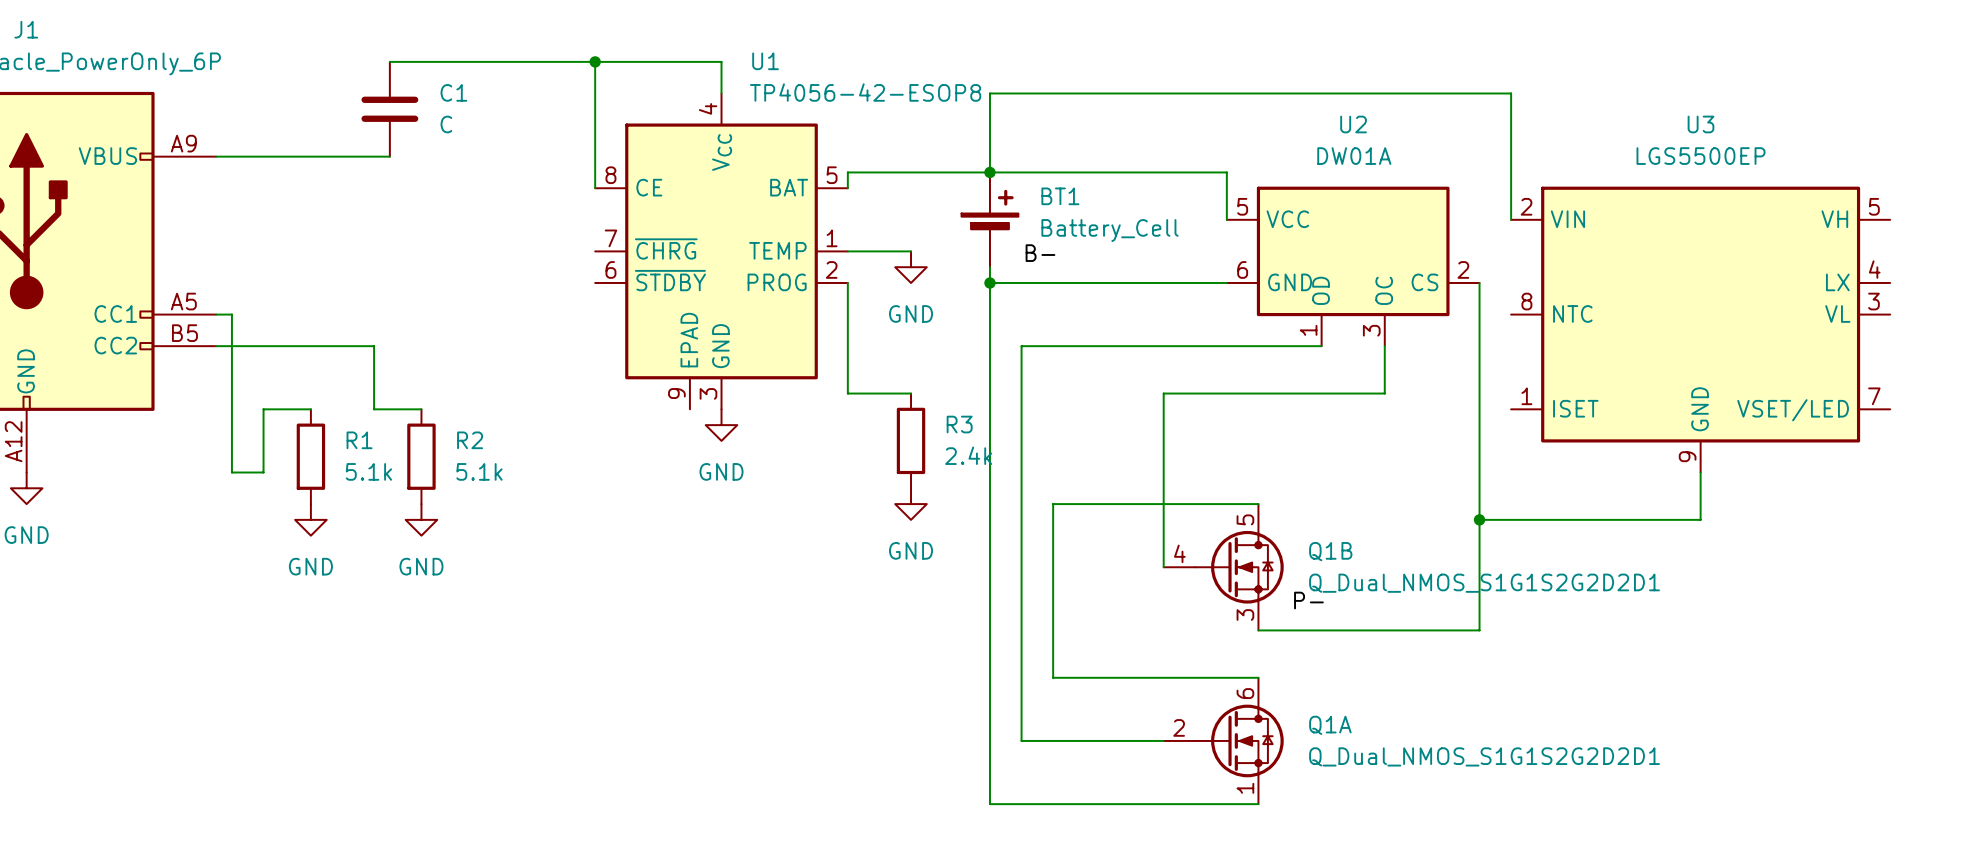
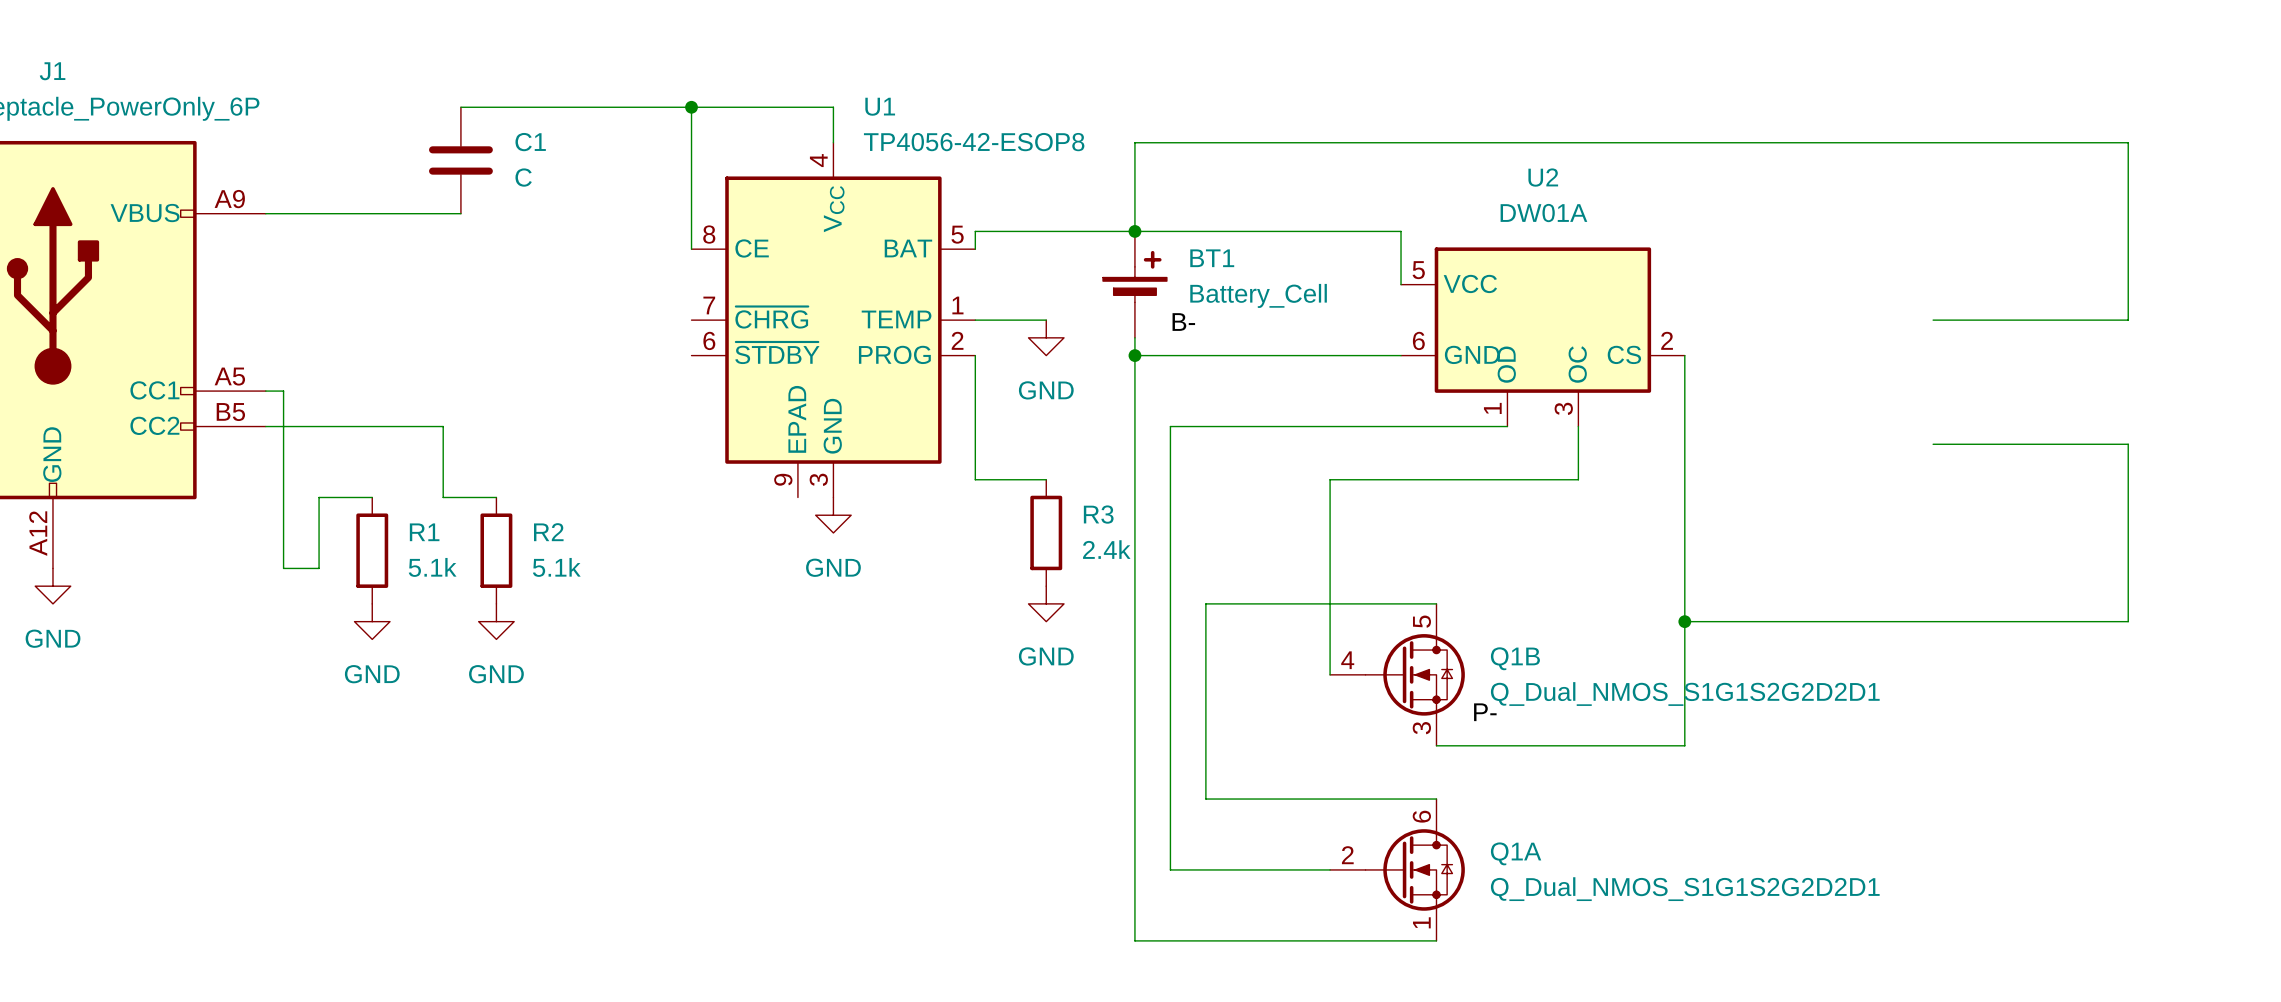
wire: (1511, 93) (1511, 219) -> (1720, 142) (2128, 142) (2128, 320) (1933, 320)
U3: LGS5500EP (1700, 329) -> none
wire: (1700, 472) (1700, 519) -> (1933, 444) (2128, 444) (2128, 621) (1933, 621)

